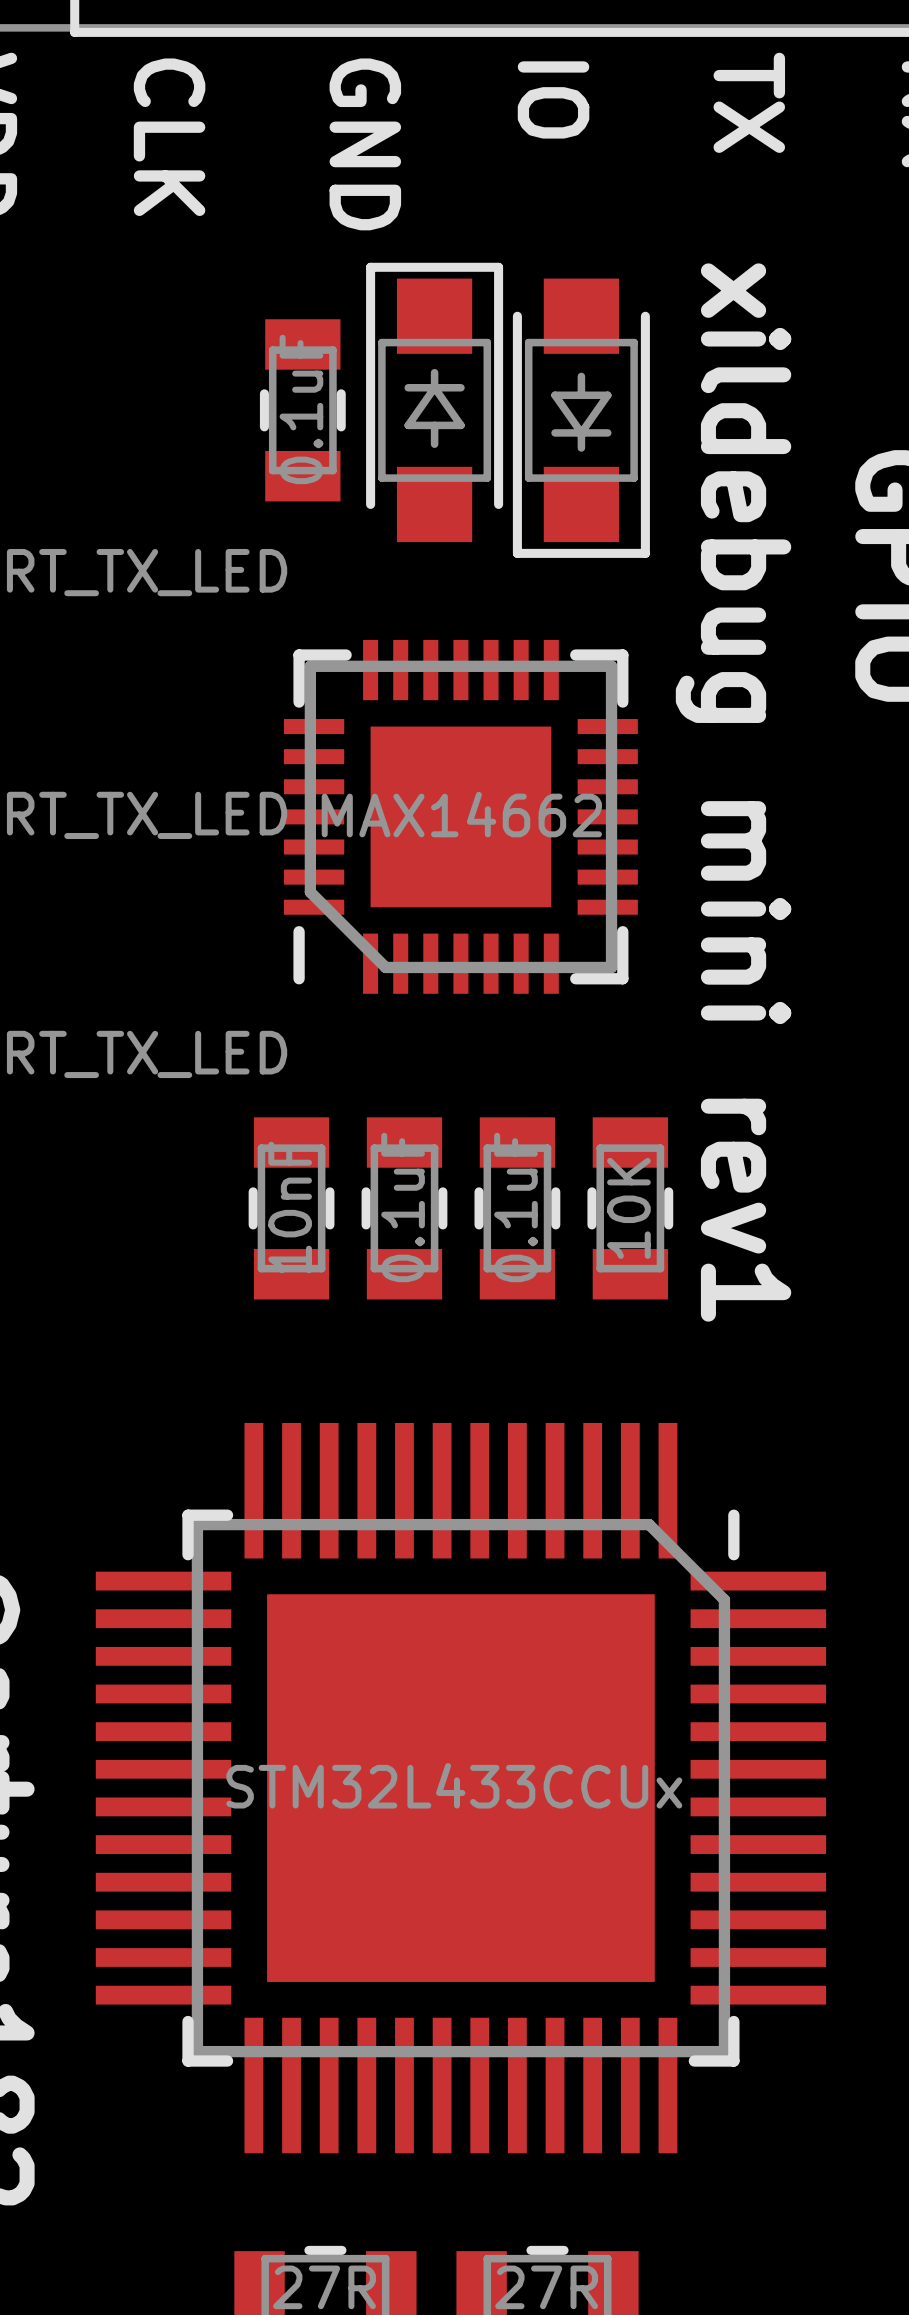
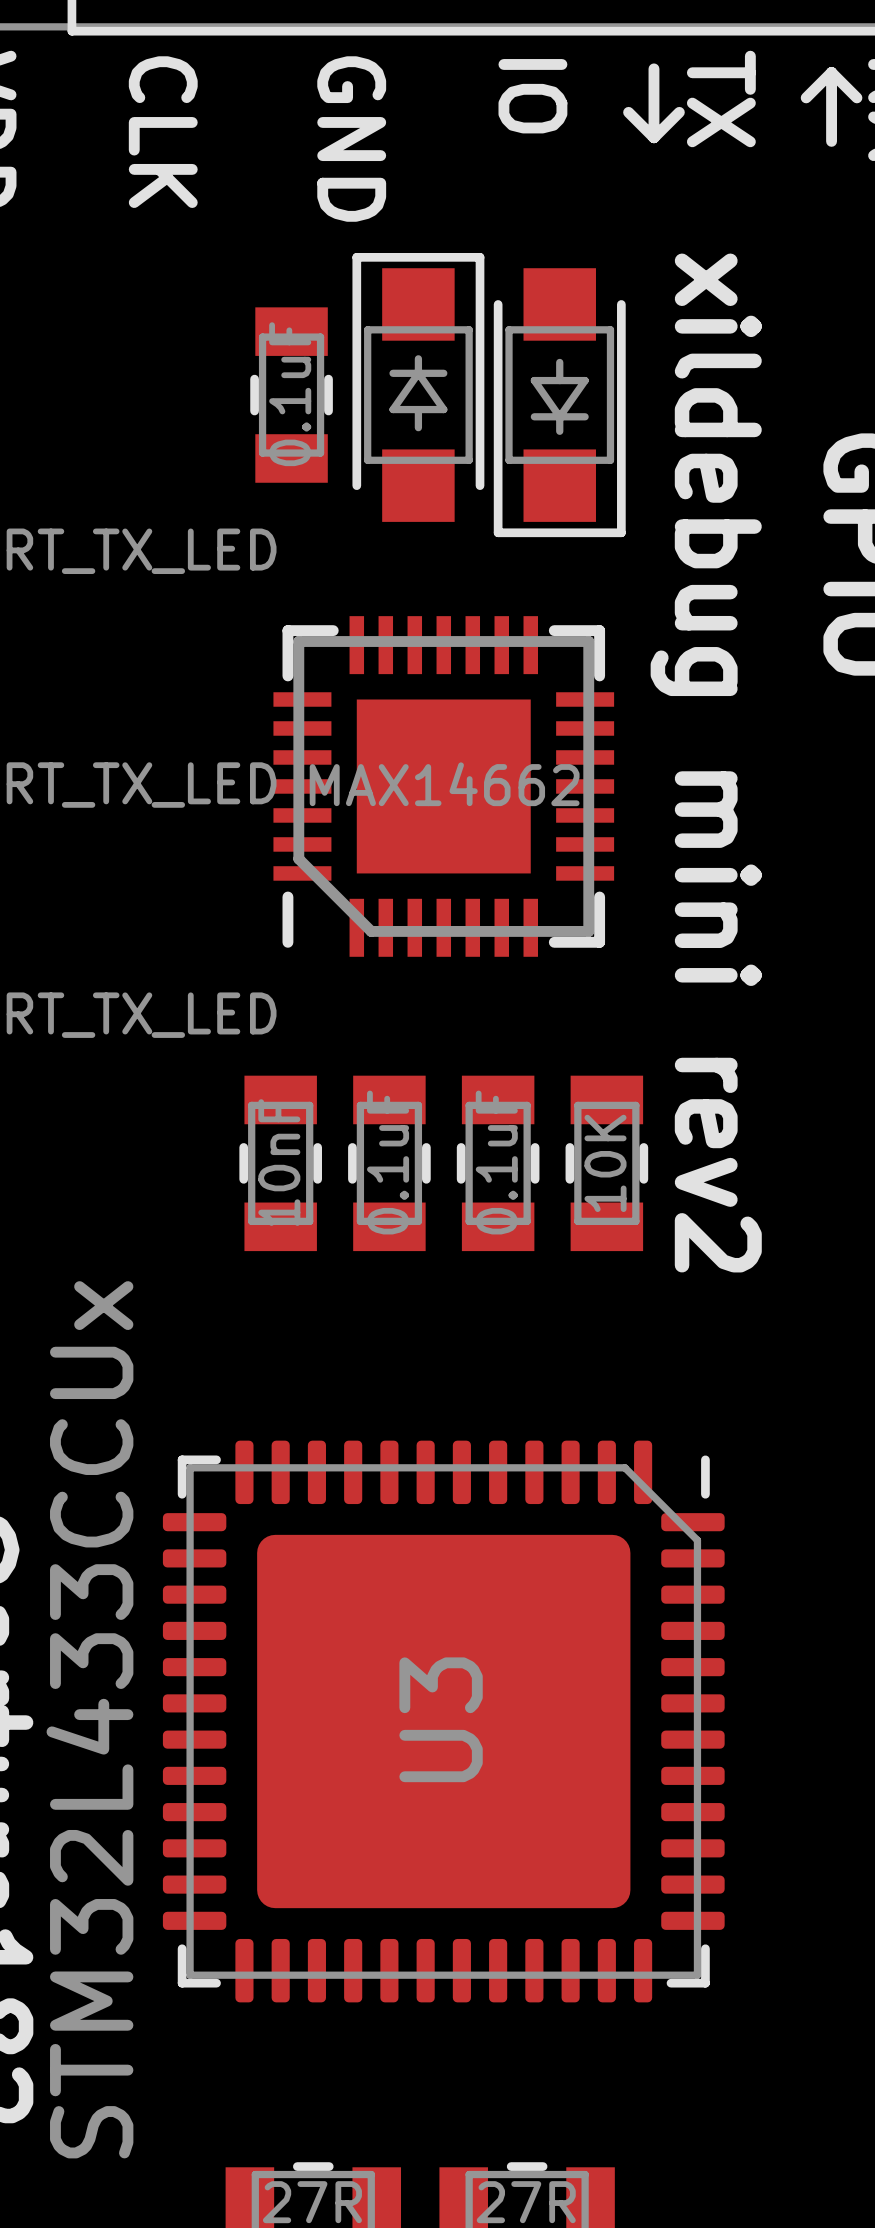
line: none -> (653, 68) (653, 137)
line: none -> (831, 72) (856, 97)
line: none -> (831, 72) (806, 97)
line: none -> (831, 72) (831, 141)
line: none -> (628, 112) (653, 137)
line: none -> (679, 112) (653, 137)
text: xildebug mini rev1 (733, 792) -> xildebug mini rev2 (706, 763)
part: STM32L433CCUx (460, 1788) -> none
U3: none -> STM32L433CCUx (443, 1721)

